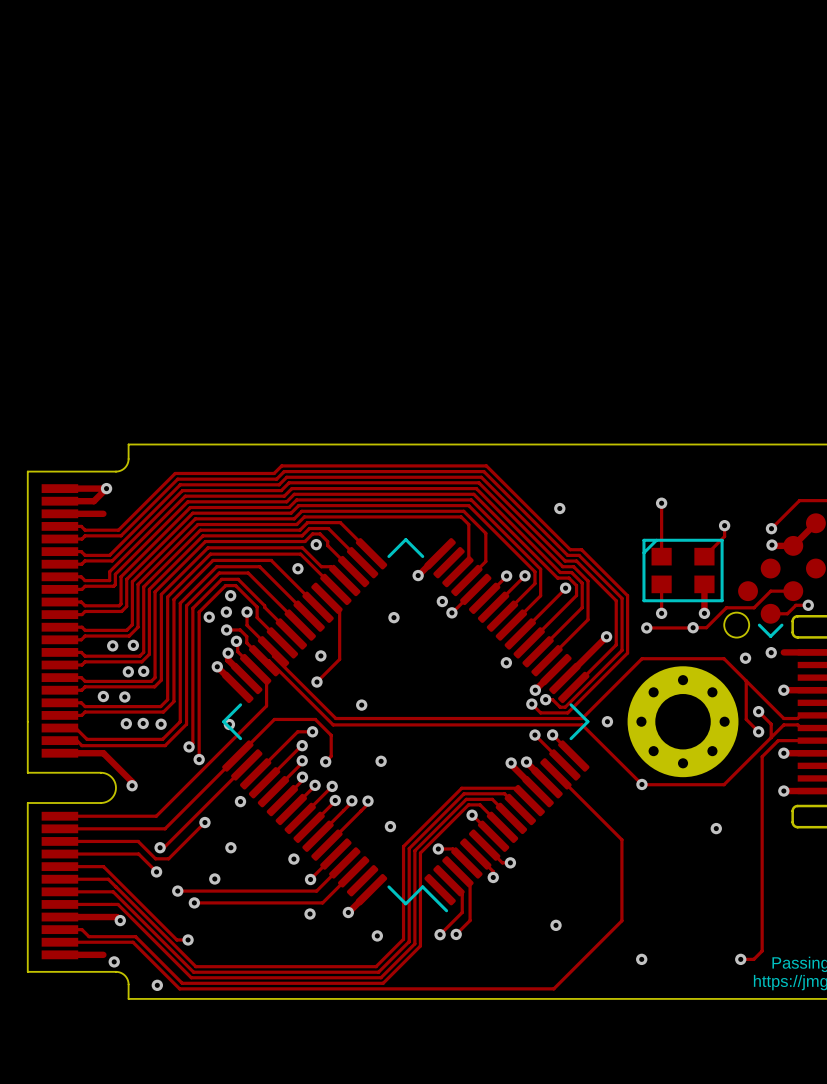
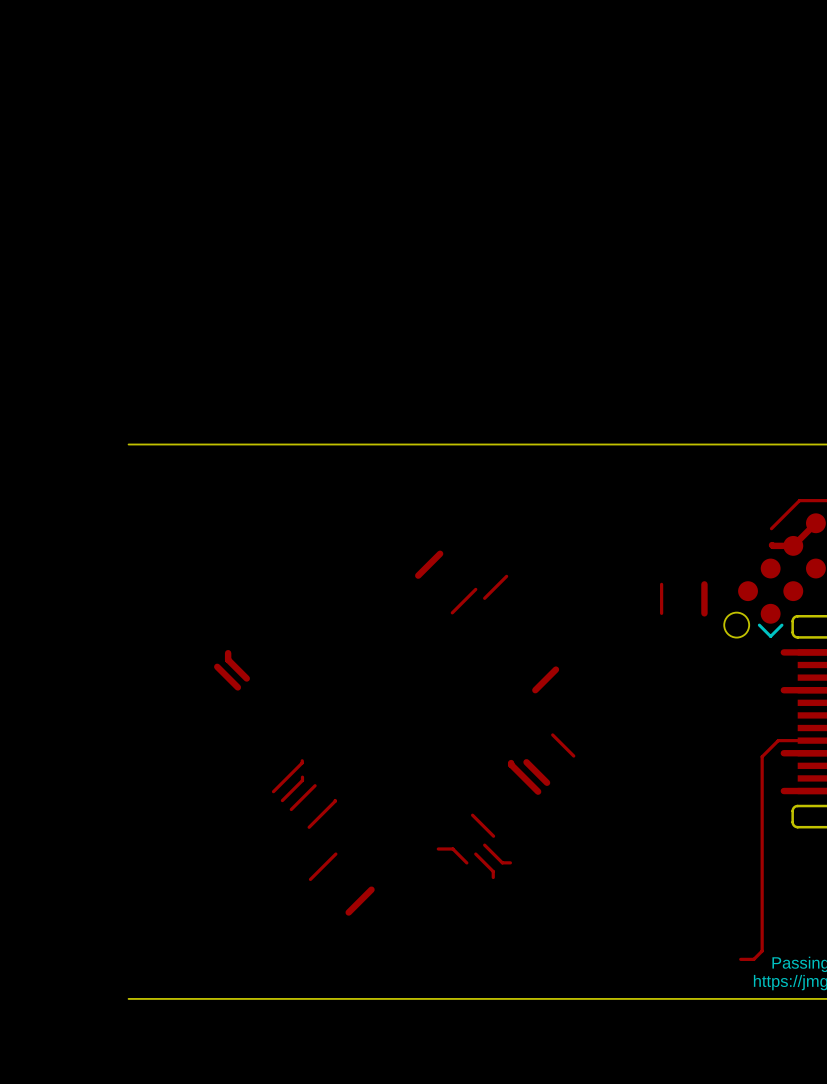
track: (59, 488) (106, 488) (93, 501) (59, 501) -> none
via: (106, 488) -> none
track: (661, 503) (661, 556) -> none
via: (661, 503) -> none
via: (559, 508) -> none
track: (59, 513) (103, 513) -> none
track: (724, 525) (724, 536) (704, 556) -> none
via: (724, 525) -> none
track: (59, 526) (81, 526) (85, 530) (118, 530) (175, 473) (274, 473) (281, 465) (486, 465) (570, 549) (581, 549) (627, 595) (627, 653) (567, 712) (540, 712) (531, 704) -> none
via: (771, 528) -> none
track: (59, 539) (81, 539) (85, 535) (121, 535) (177, 479) (276, 479) (284, 471) (483, 471) (567, 555) (579, 555) (622, 598) (622, 650) (565, 707) (560, 707) (552, 699) (545, 699) -> none
via: (316, 544) -> none
via: (771, 545) -> none
track: (59, 551) (81, 551) (85, 555) (109, 555) (180, 484) (279, 484) (286, 477) (481, 477) (565, 561) (576, 561) (616, 600) (616, 644) (573, 687) -> none
track: (371, 553) (340, 522) (307, 522) (299, 530) (200, 530) (143, 586) (143, 652) (139, 656) (85, 656) (81, 652) (59, 652) -> none
track: (362, 562) (328, 528) (309, 528) (302, 535) (202, 535) (149, 589) (149, 654) (141, 661) (85, 661) (81, 665) (59, 665) -> none
track: (59, 564) (81, 564) (84, 560) (112, 560) (182, 490) (281, 490) (289, 482) (478, 482) (562, 566) (573, 566) (588, 581) (588, 619) (547, 660) -> none
via: (297, 568) -> none
part: (683, 570) -> none
track: (353, 571) (327, 545) (327, 541) (320, 533) (312, 533) (305, 541) (205, 541) (155, 591) (155, 677) (151, 681) (85, 681) (81, 677) (59, 677) -> none
track: (457, 571) (468, 560) (468, 524) (461, 516) (304, 516) (296, 524) (197, 524) (138, 584) (138, 627) (129, 636) (85, 636) (81, 639) (59, 639) -> none
via: (418, 575) -> none
track: (525, 575) (493, 607) -> none
via: (525, 575) -> none
track: (59, 576) (81, 576) (84, 580) (109, 580) (109, 571) (185, 496) (284, 496) (291, 488) (476, 488) (560, 572) (571, 572) (582, 583) (582, 607) (538, 651) -> none
via: (506, 576) -> none
track: (344, 580) (331, 566) (321, 566) (302, 547) (207, 547) (161, 594) (161, 680) (154, 686) (85, 686) (81, 690) (59, 690) -> none
track: (466, 580) (485, 561) (485, 533) (463, 511) (301, 511) (294, 518) (195, 518) (132, 581) (132, 624) (126, 630) (85, 630) (81, 627) (59, 627) -> none
track: (565, 588) (520, 633) -> none
via: (565, 588) -> none
track: (59, 589) (81, 589) (85, 586) (113, 586) (115, 574) (187, 501) (286, 501) (294, 494) (473, 494) (557, 578) (568, 578) (576, 585) (576, 595) (529, 642) -> none
track: (335, 589) (300, 554) (210, 554) (167, 596) (167, 699) (160, 706) (85, 706) (81, 702) (59, 702) -> none
track: (794, 591) (770, 591) (754, 607) (726, 607) (706, 627) (693, 627) -> none
via: (230, 595) -> none
track: (326, 598) (339, 611) (339, 659) (316, 682) -> none
via: (442, 601) -> none
track: (59, 602) (81, 602) (85, 605) (119, 605) (121, 603) (121, 576) (190, 507) (289, 507) (296, 499) (471, 499) (540, 569) (540, 595) (511, 625) -> none
track: (808, 605) (795, 605) (787, 613) (770, 613) -> none
via: (808, 605) -> none
track: (318, 607) (271, 560) (213, 560) (173, 599) (173, 701) (163, 712) (85, 712) (81, 715) (59, 715) -> none
via: (226, 612) -> none
track: (247, 612) (247, 625) (273, 651) (273, 656) (335, 718) (582, 718) (642, 658) (724, 658) (783, 718) (797, 718) (800, 715) -> none
via: (247, 612) -> none
via: (451, 612) -> none
via: (661, 613) -> none
via: (704, 613) -> none
track: (59, 614) (81, 614) (85, 611) (121, 611) (126, 606) (126, 579) (192, 513) (291, 513) (298, 505) (468, 505) (534, 571) (534, 583) (502, 616) -> none
track: (309, 616) (259, 566) (216, 566) (180, 603) (180, 721) (162, 739) (87, 739) (75, 728) (59, 728) -> none
via: (209, 617) -> none
via: (393, 617) -> none
track: (300, 625) (248, 573) (219, 573) (186, 605) (186, 724) (165, 745) (81, 745) (76, 740) (59, 740) -> none
track: (646, 627) (692, 627) -> none
via: (646, 627) -> none
via: (693, 627) -> none
track: (226, 629) (240, 629) (246, 636) (246, 642) (264, 660) (268, 660) (333, 724) (582, 724) (641, 784) -> none
via: (226, 629) -> none
track: (291, 633) (238, 579) (221, 579) (192, 608) (192, 743) (189, 746) -> none
track: (606, 636) (564, 678) -> none
via: (606, 636) -> none
track: (236, 641) (237, 651) (266, 680) (266, 705) (156, 816) (59, 816) -> none
via: (236, 641) -> none
track: (282, 642) (257, 617) (257, 607) (235, 585) (225, 585) (199, 612) (199, 759) -> none
via: (112, 645) -> none
via: (133, 645) -> none
via: (771, 652) -> none
via: (228, 653) -> none
via: (320, 655) -> none
via: (745, 658) -> none
via: (506, 662) -> none
via: (217, 666) -> none
via: (128, 671) -> none
via: (143, 671) -> none
track: (746, 680) (746, 719) (758, 731) -> none
via: (316, 682) -> none
via: (535, 690) -> none
via: (783, 690) -> none
via: (103, 696) -> none
via: (124, 697) -> none
via: (545, 699) -> none
via: (531, 704) -> none
via: (361, 705) -> none
track: (758, 711) (771, 724) (771, 737) -> none
via: (758, 711) -> none
part: (78, 721) -> none
via: (607, 721) -> none
part: (683, 721) -> none
via: (126, 723) -> none
via: (143, 723) -> none
via: (161, 724) -> none
via: (229, 724) -> none
part: (405, 725) -> none
track: (800, 728) (797, 724) (783, 724) (724, 784) (642, 784) -> none
track: (312, 731) (297, 731) (255, 773) -> none
via: (312, 731) -> none
via: (758, 731) -> none
via: (552, 734) -> none
track: (534, 735) (564, 764) -> none
via: (534, 735) -> none
track: (302, 745) (264, 782) -> none
via: (302, 745) -> none
via: (189, 746) -> none
track: (59, 753) (103, 753) (132, 781) (132, 785) -> none
via: (783, 753) -> none
via: (199, 759) -> none
via: (302, 760) -> none
track: (325, 761) (331, 756) (331, 735) (315, 719) (274, 719) (165, 828) (59, 828) -> none
via: (325, 761) -> none
via: (381, 761) -> none
via: (526, 762) -> none
via: (511, 763) -> none
track: (246, 764) (163, 847) (160, 847) -> none
track: (555, 773) (621, 839) (621, 920) (553, 988) (179, 988) (133, 942) (59, 942) -> none
via: (302, 777) -> none
via: (641, 784) -> none
via: (132, 785) -> none
via: (315, 785) -> none
track: (332, 786) (300, 818) -> none
via: (332, 786) -> none
via: (783, 791) -> none
via: (335, 800) -> none
track: (351, 800) (318, 836) -> none
via: (351, 800) -> none
track: (529, 800) (516, 788) (461, 788) (403, 846) (403, 939) (376, 966) (195, 966) (108, 879) (59, 879) -> none
via: (240, 801) -> none
track: (368, 801) (368, 804) (326, 845) -> none
via: (368, 801) -> none
track: (520, 809) (504, 793) (464, 793) (409, 848) (409, 941) (378, 972) (193, 972) (113, 891) (59, 891) -> none
via: (472, 815) -> none
track: (511, 818) (492, 799) (466, 799) (414, 850) (414, 943) (380, 977) (191, 977) (118, 904) (59, 904) -> none
track: (204, 822) (168, 858) (155, 858) (138, 841) (59, 841) -> none
via: (204, 822) -> none
via: (390, 826) -> none
track: (502, 827) (480, 804) (468, 804) (420, 853) (420, 946) (383, 983) (182, 983) (135, 936) (89, 936) (81, 929) (59, 929) -> none
via: (716, 828) -> none
via: (160, 847) -> none
via: (230, 847) -> none
via: (438, 848) -> none
track: (59, 854) (138, 854) (156, 871) -> none
via: (293, 859) -> none
track: (344, 862) (316, 891) (177, 891) -> none
via: (510, 862) -> none
track: (59, 866) (103, 866) (176, 939) (188, 939) -> none
via: (156, 871) -> none
track: (353, 871) (322, 902) (194, 902) -> none
track: (457, 871) (470, 884) (470, 920) (456, 934) -> none
via: (493, 877) -> none
via: (214, 878) -> none
via: (310, 879) -> none
track: (449, 880) (462, 894) (462, 912) (440, 934) -> none
via: (177, 891) -> none
via: (194, 902) -> none
via: (348, 912) -> none
via: (310, 914) -> none
track: (59, 917) (116, 917) (120, 920) -> none
via: (120, 920) -> none
via: (556, 925) -> none
via: (440, 934) -> none
via: (456, 934) -> none
via: (377, 935) -> none
via: (188, 939) -> none
track: (59, 954) (103, 954) -> none
via: (641, 959) -> none
via: (740, 959) -> none
via: (114, 961) -> none
via: (157, 985) -> none

